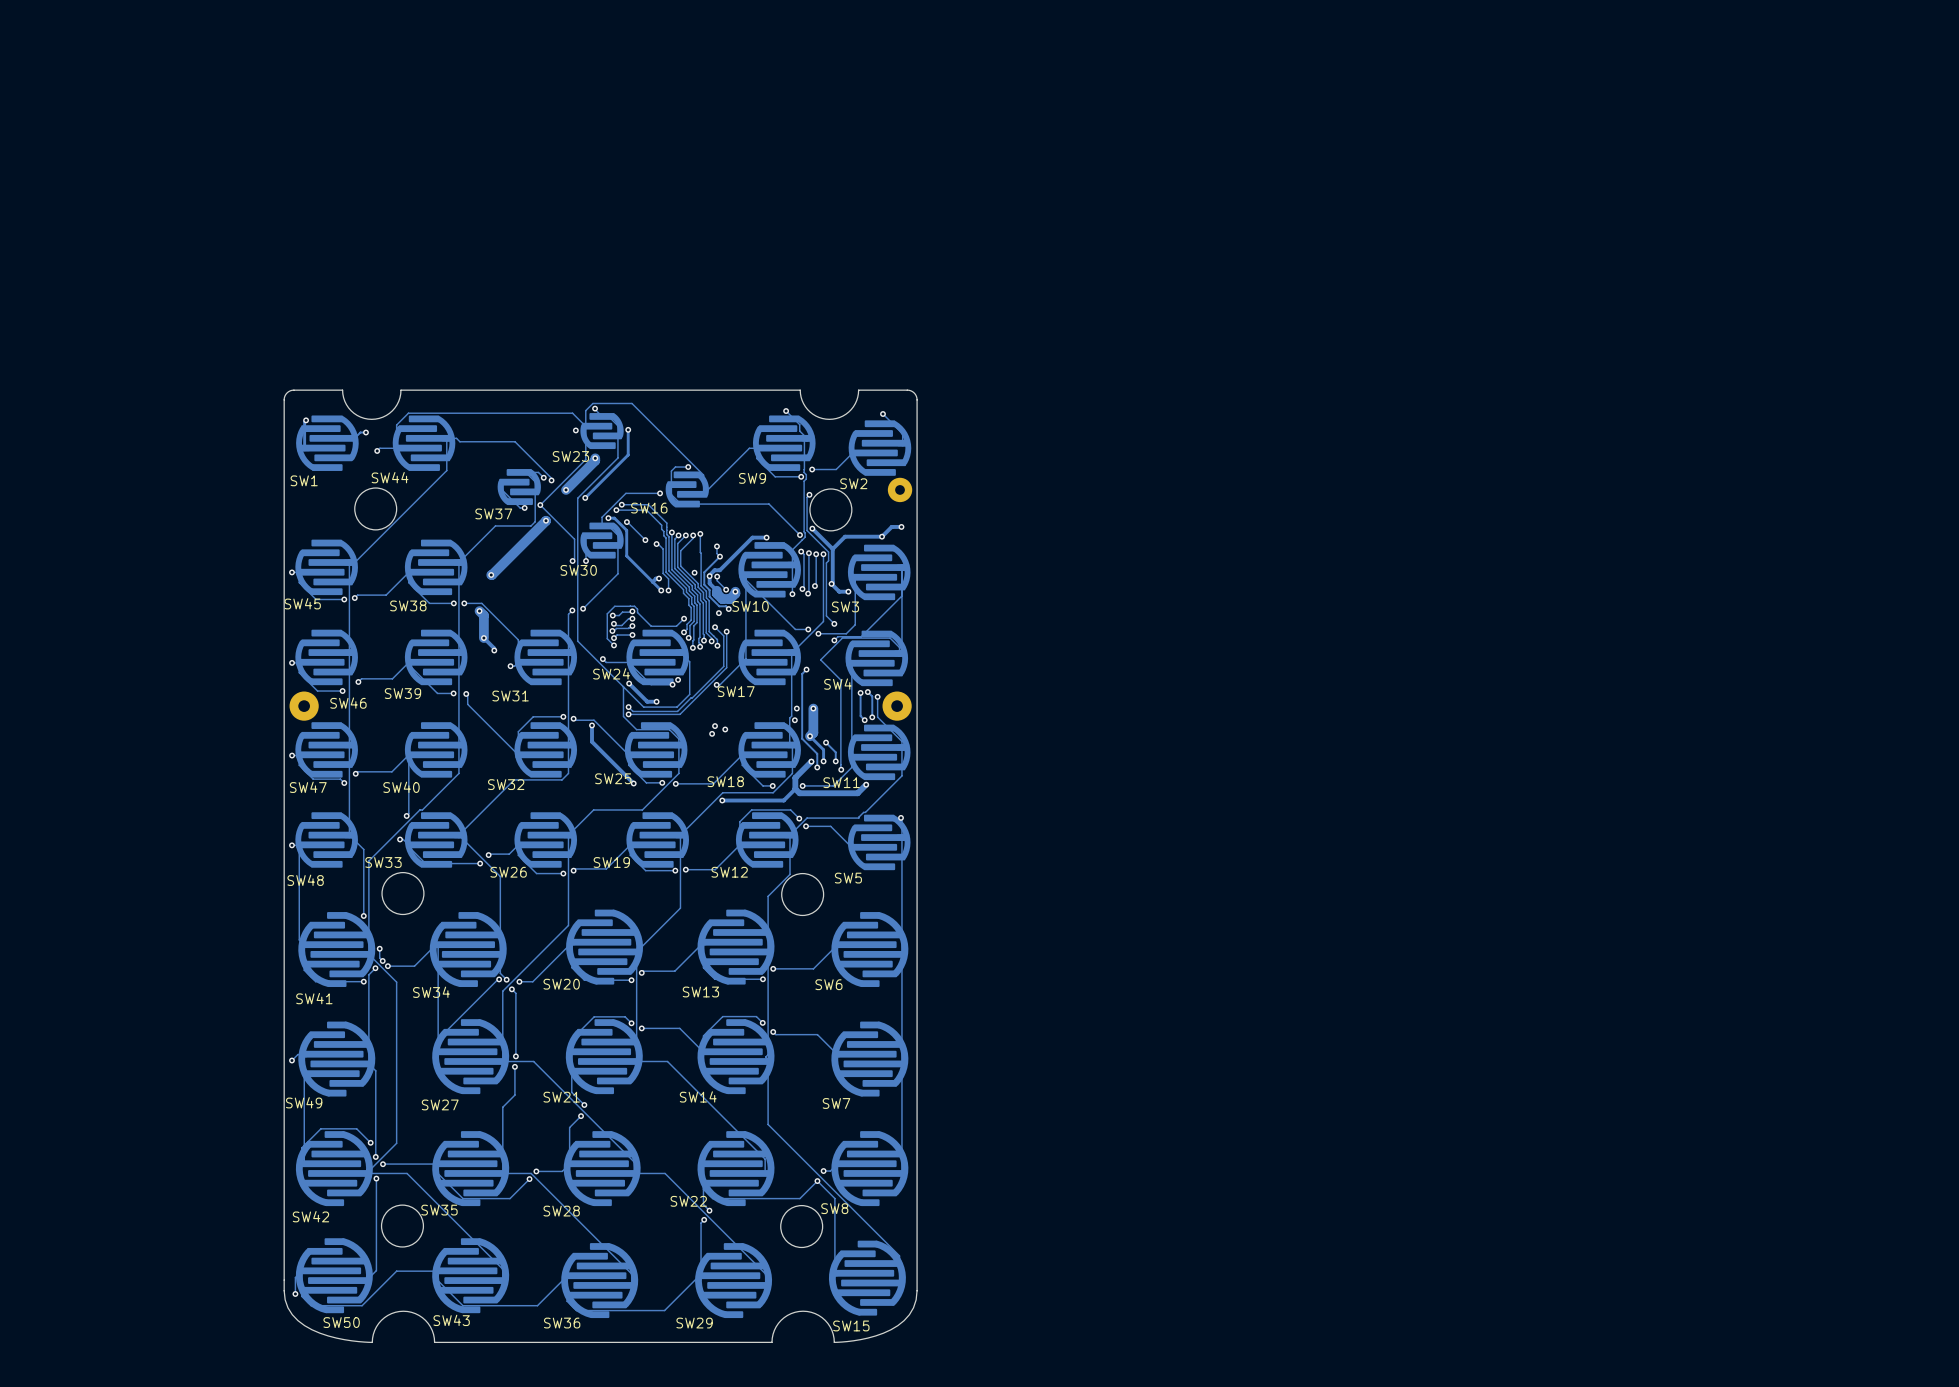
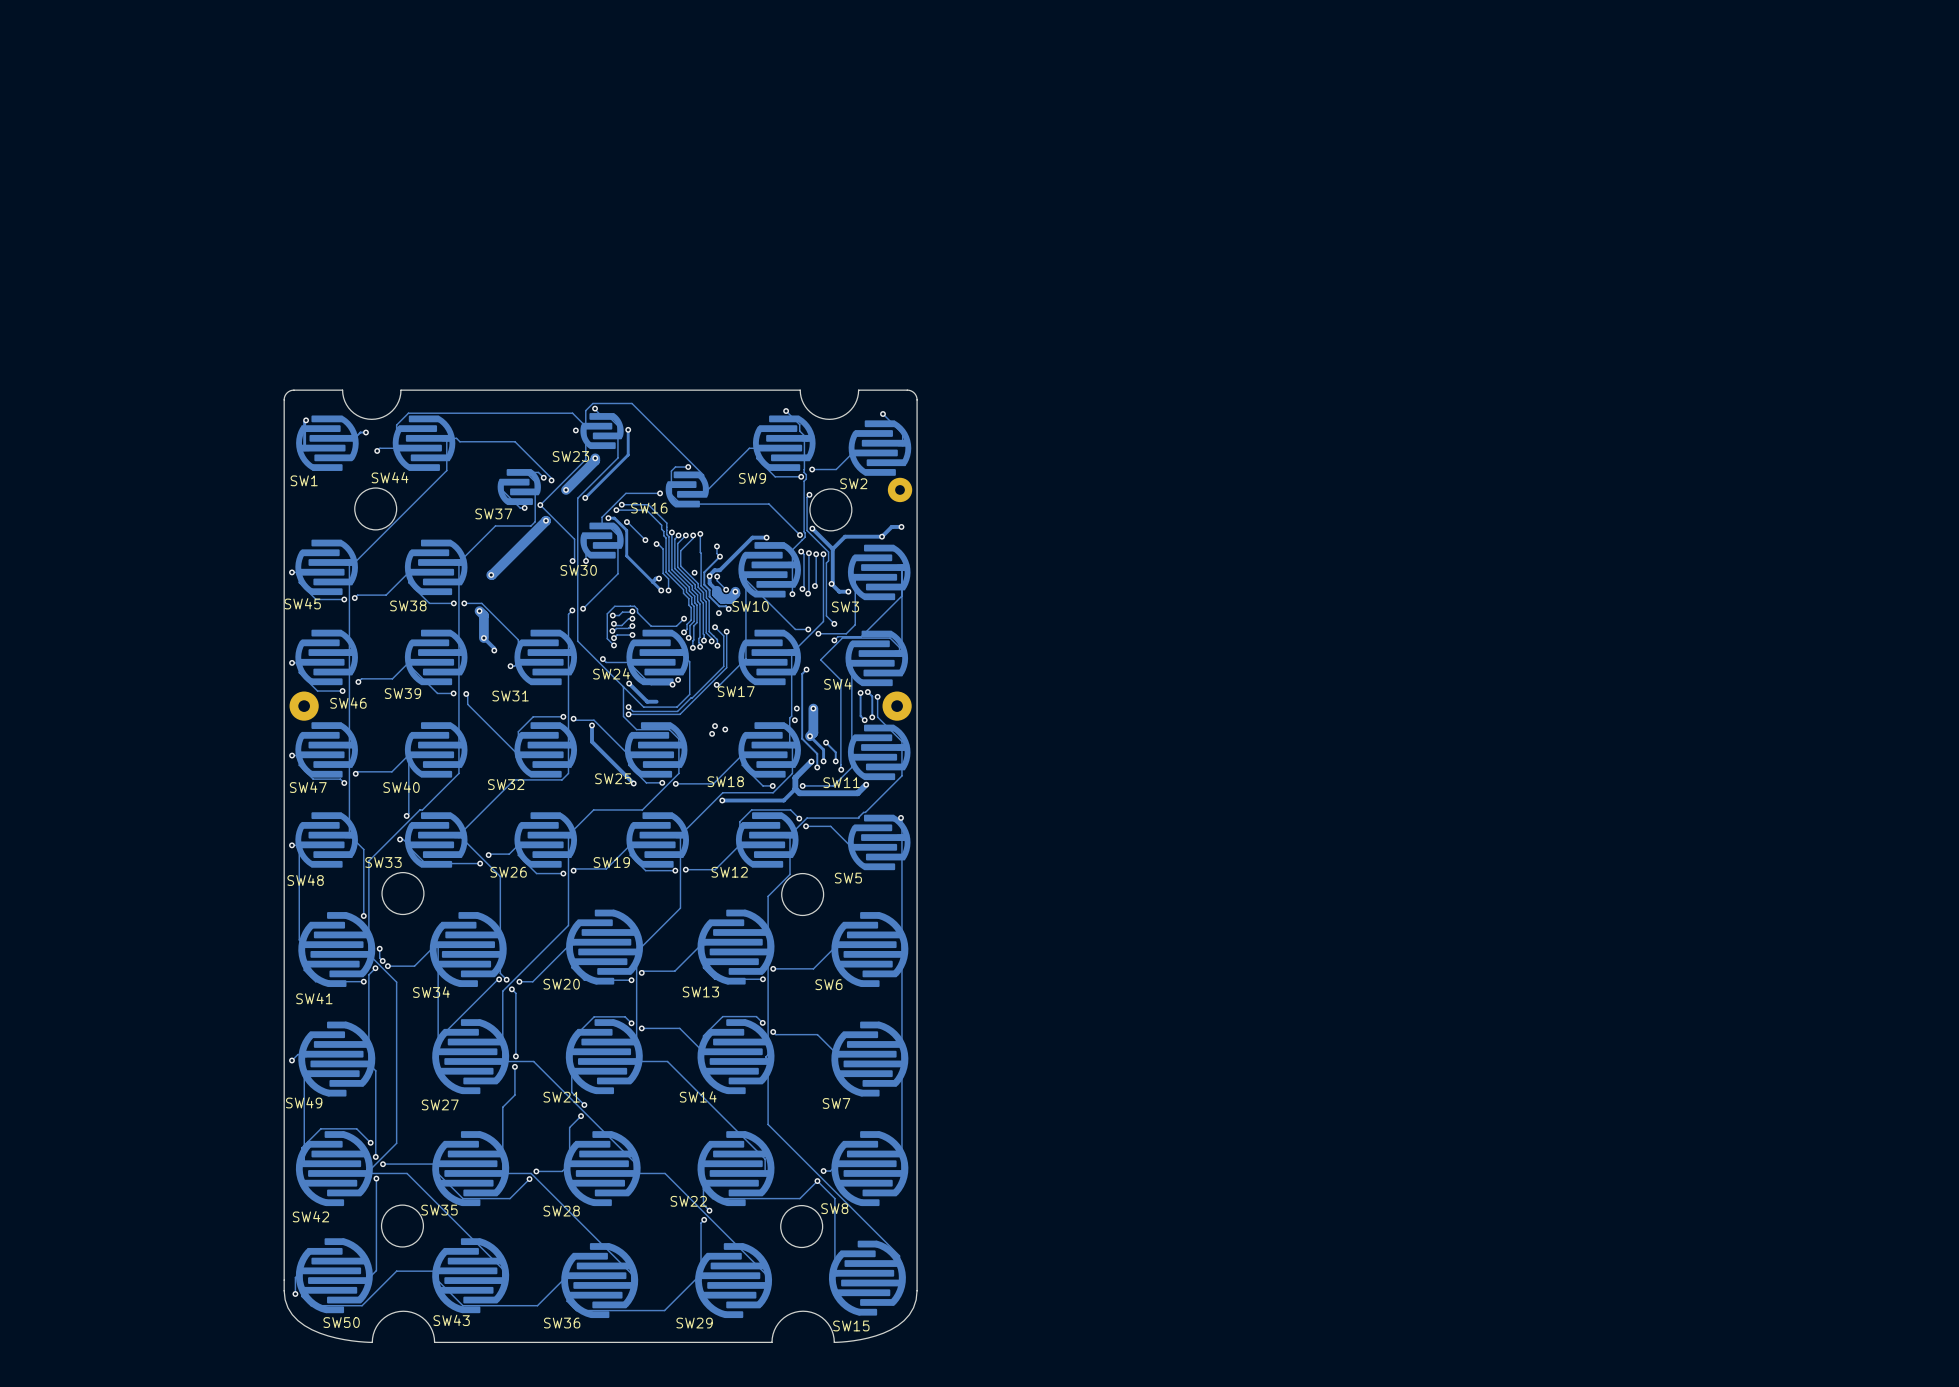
via: (656, 701) -> none

